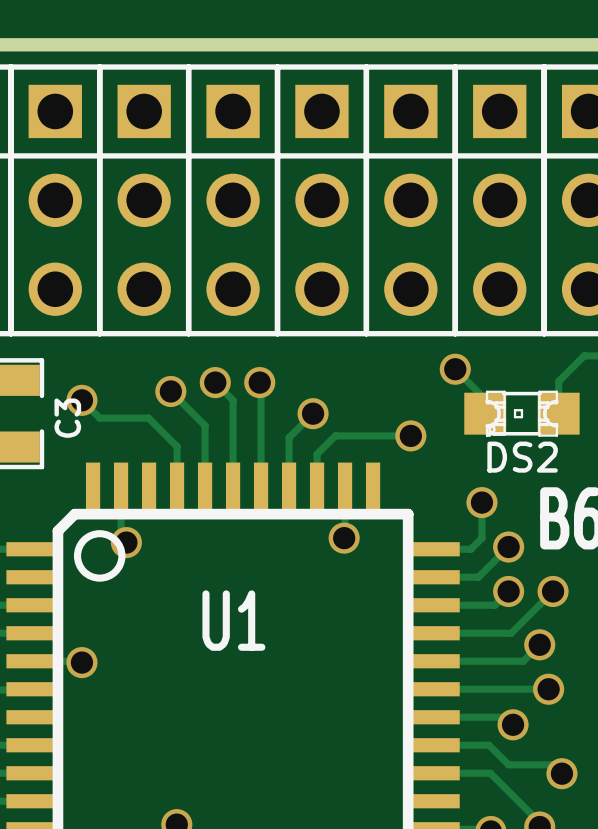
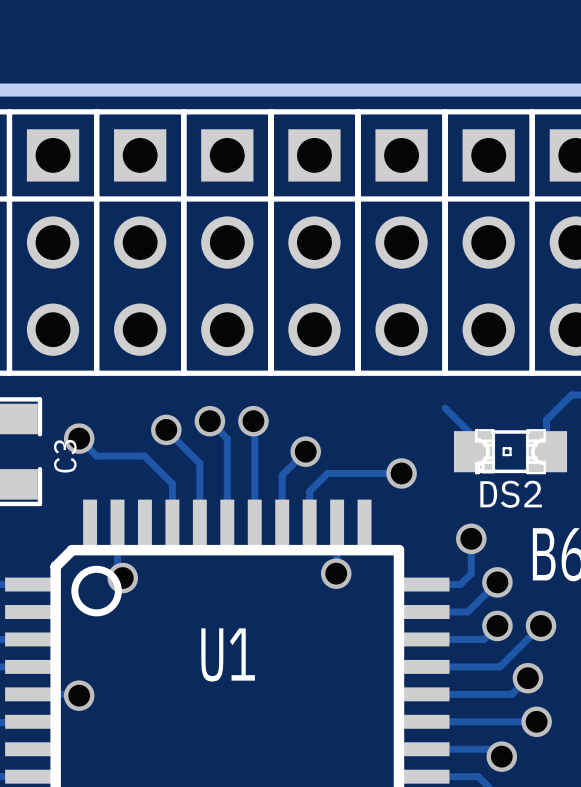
via: (455, 369) -> none

